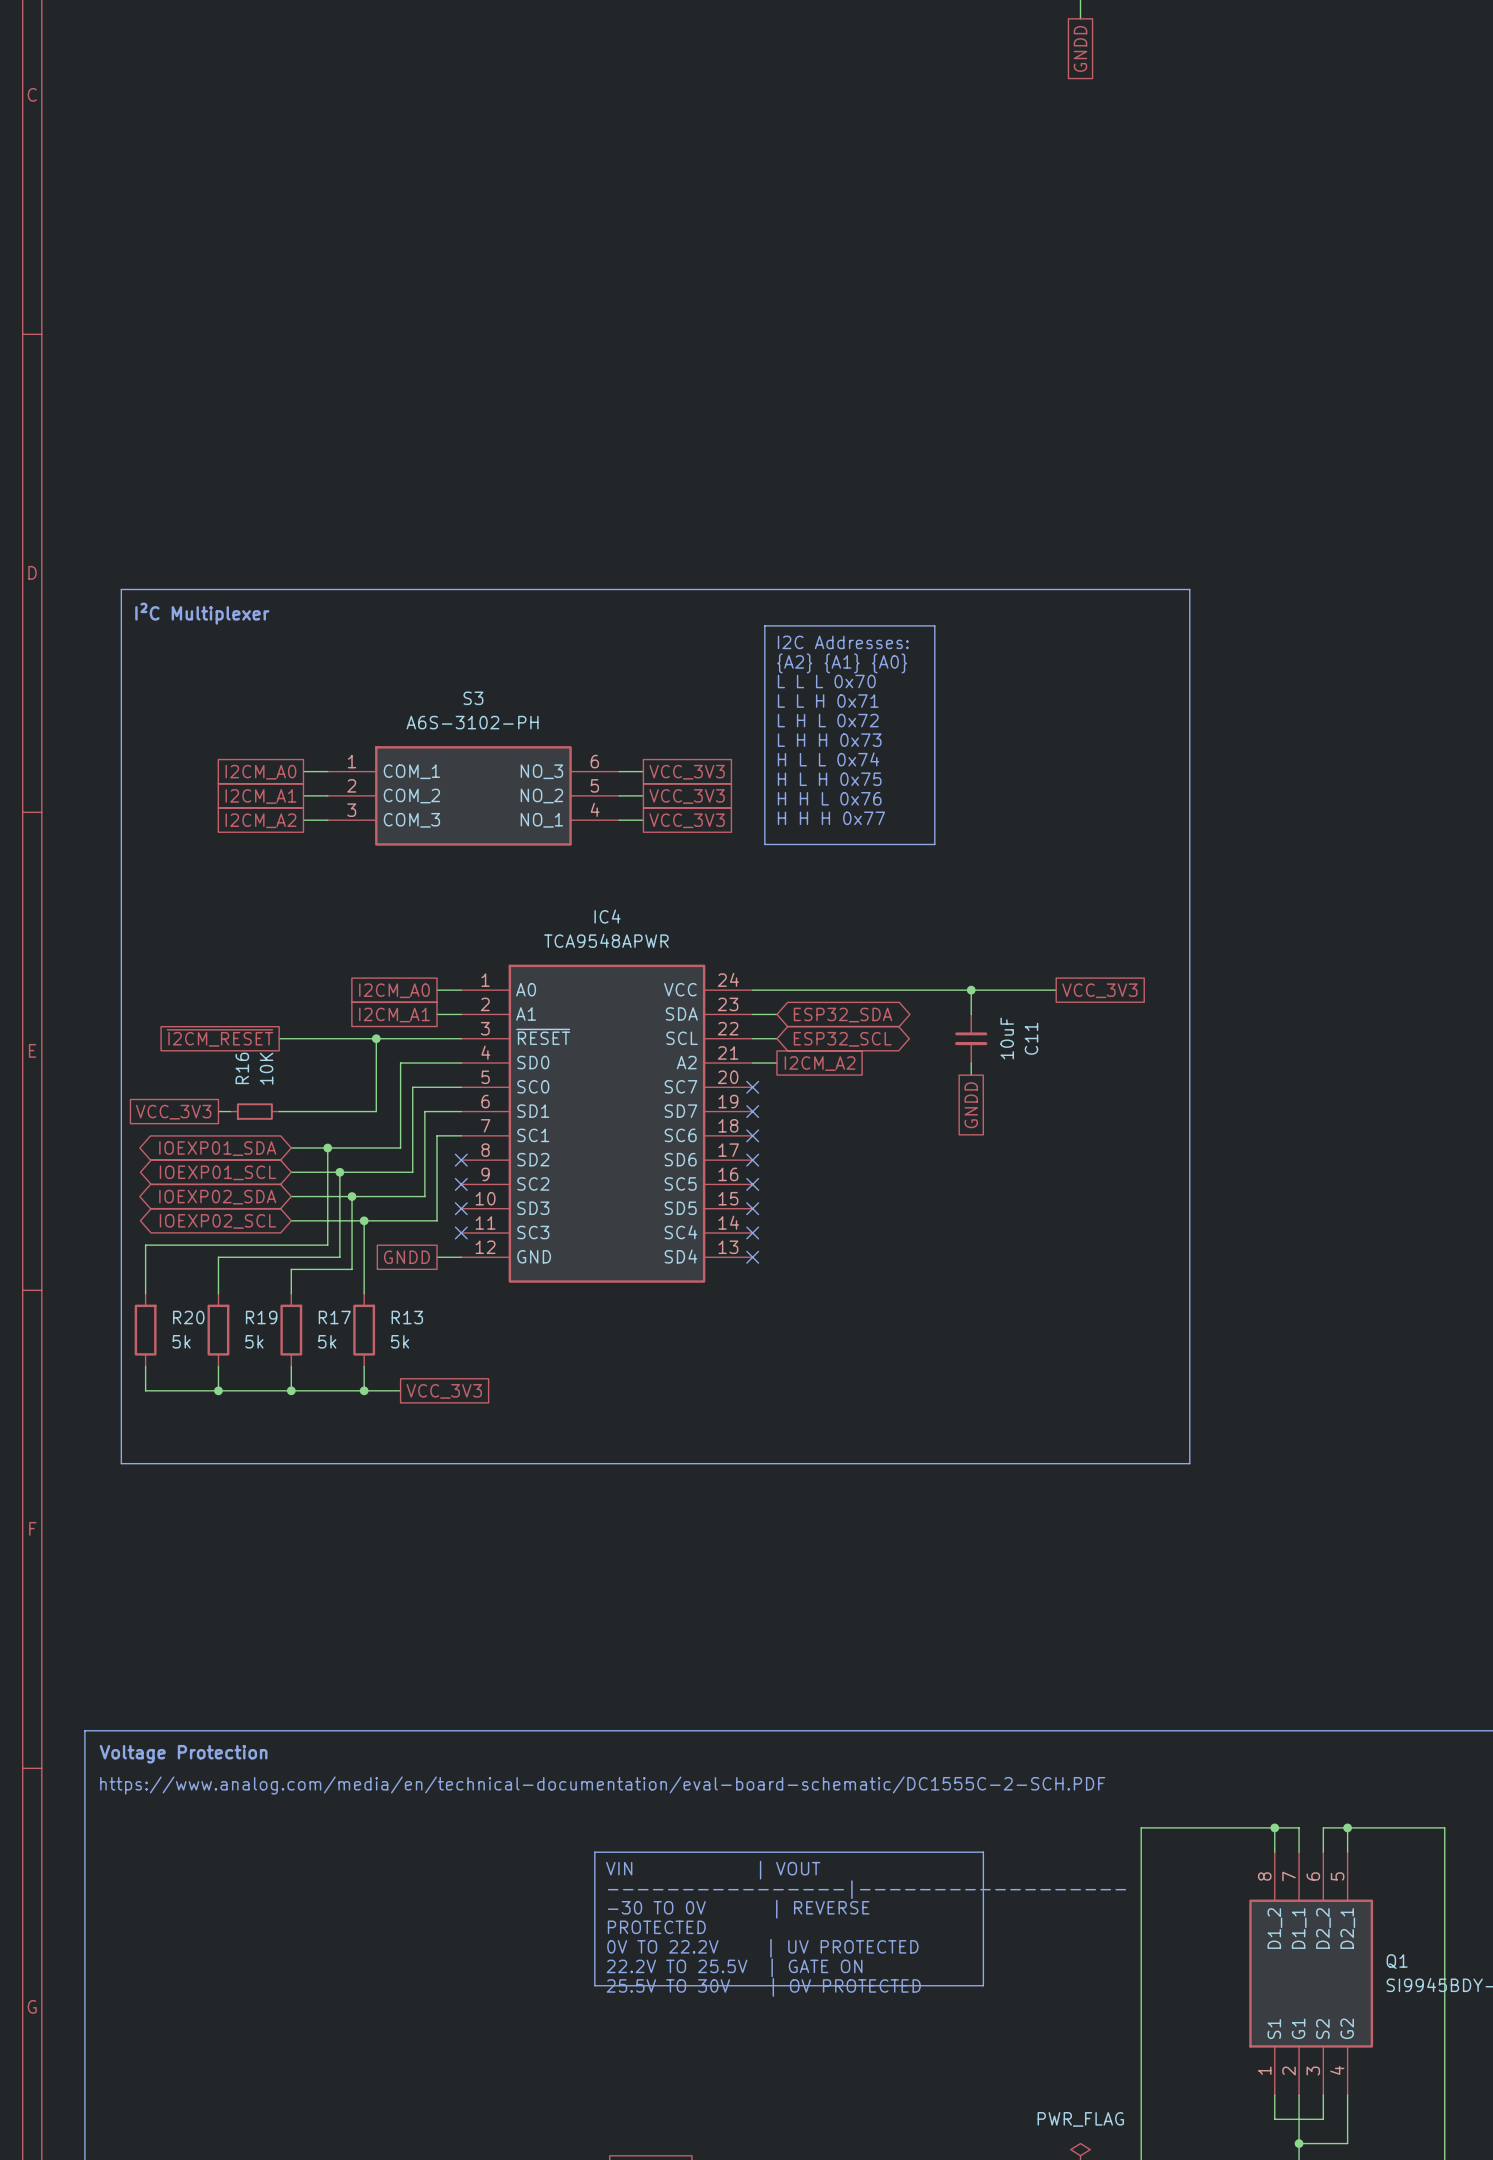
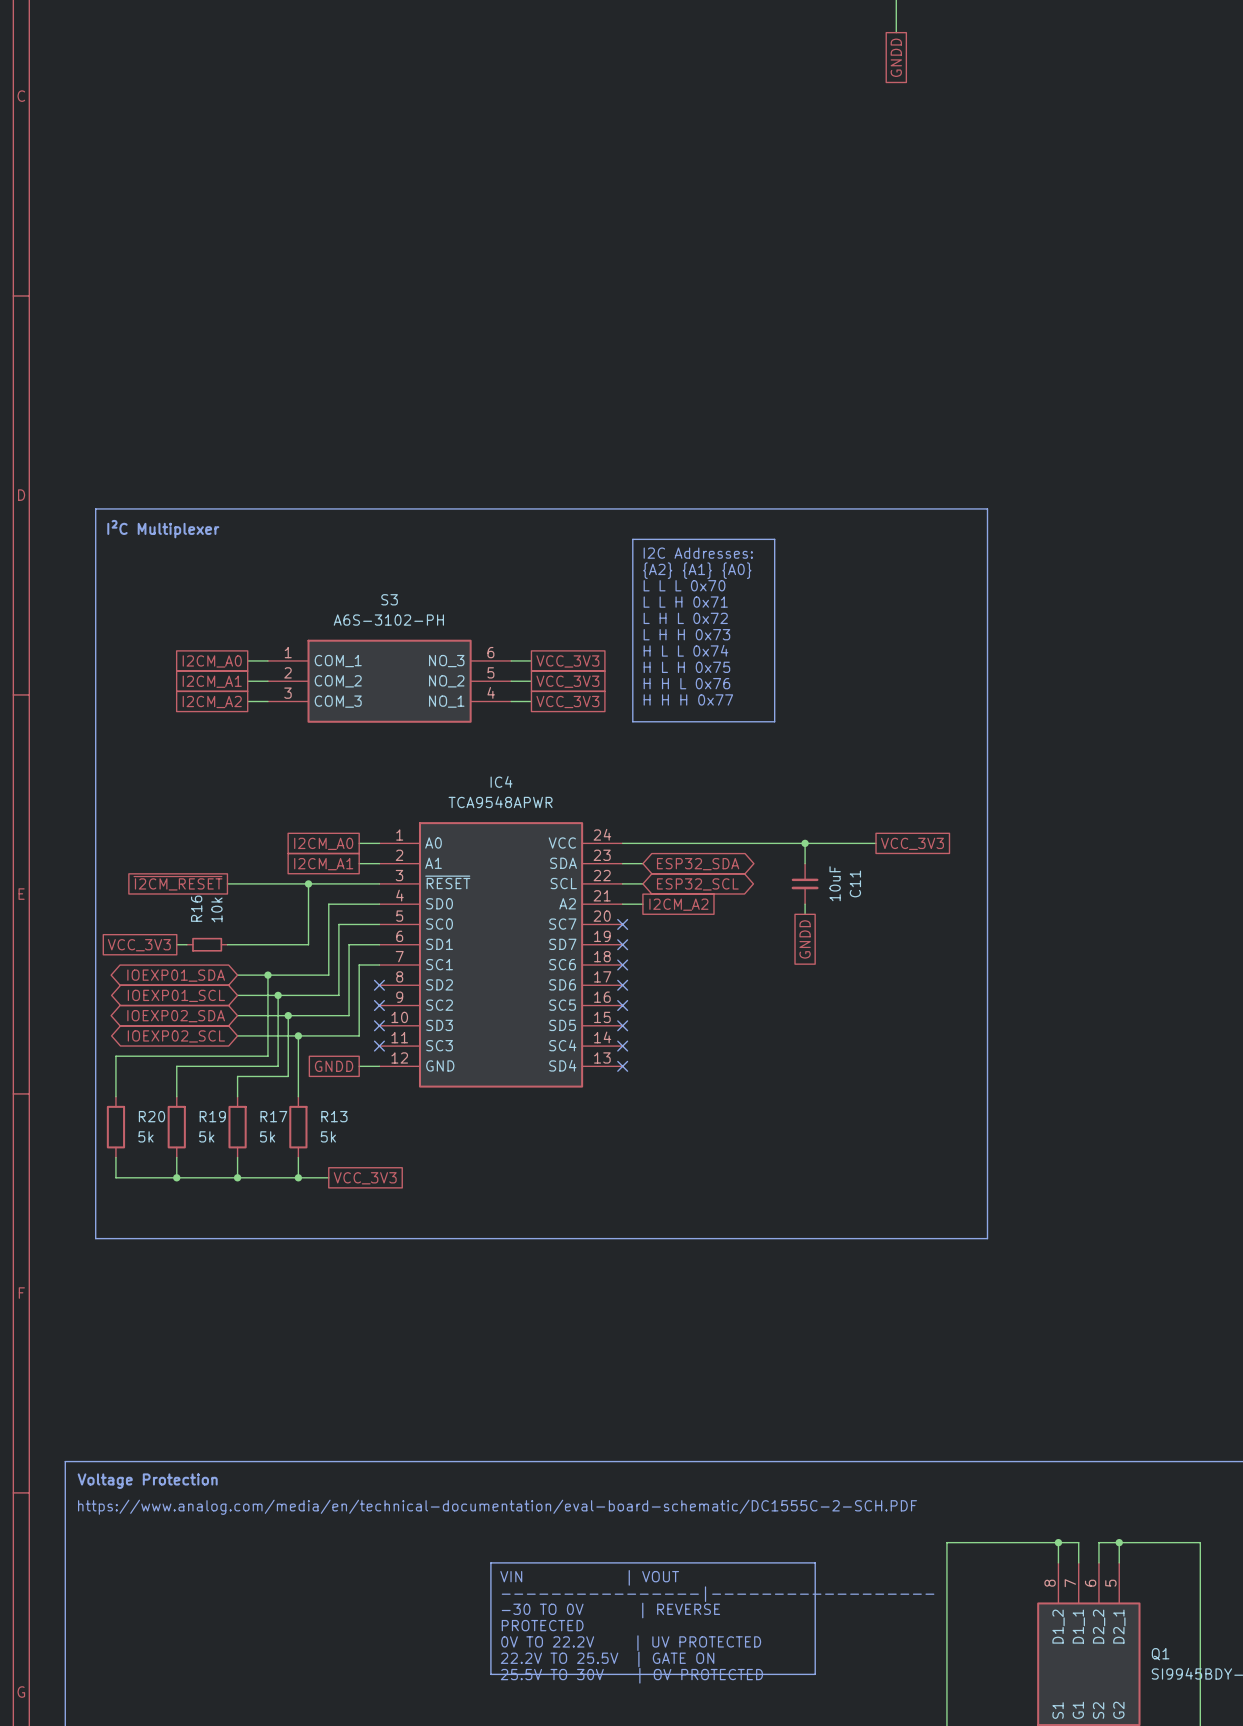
R16 value: 10K (266, 1068) -> 10k (216, 909)

